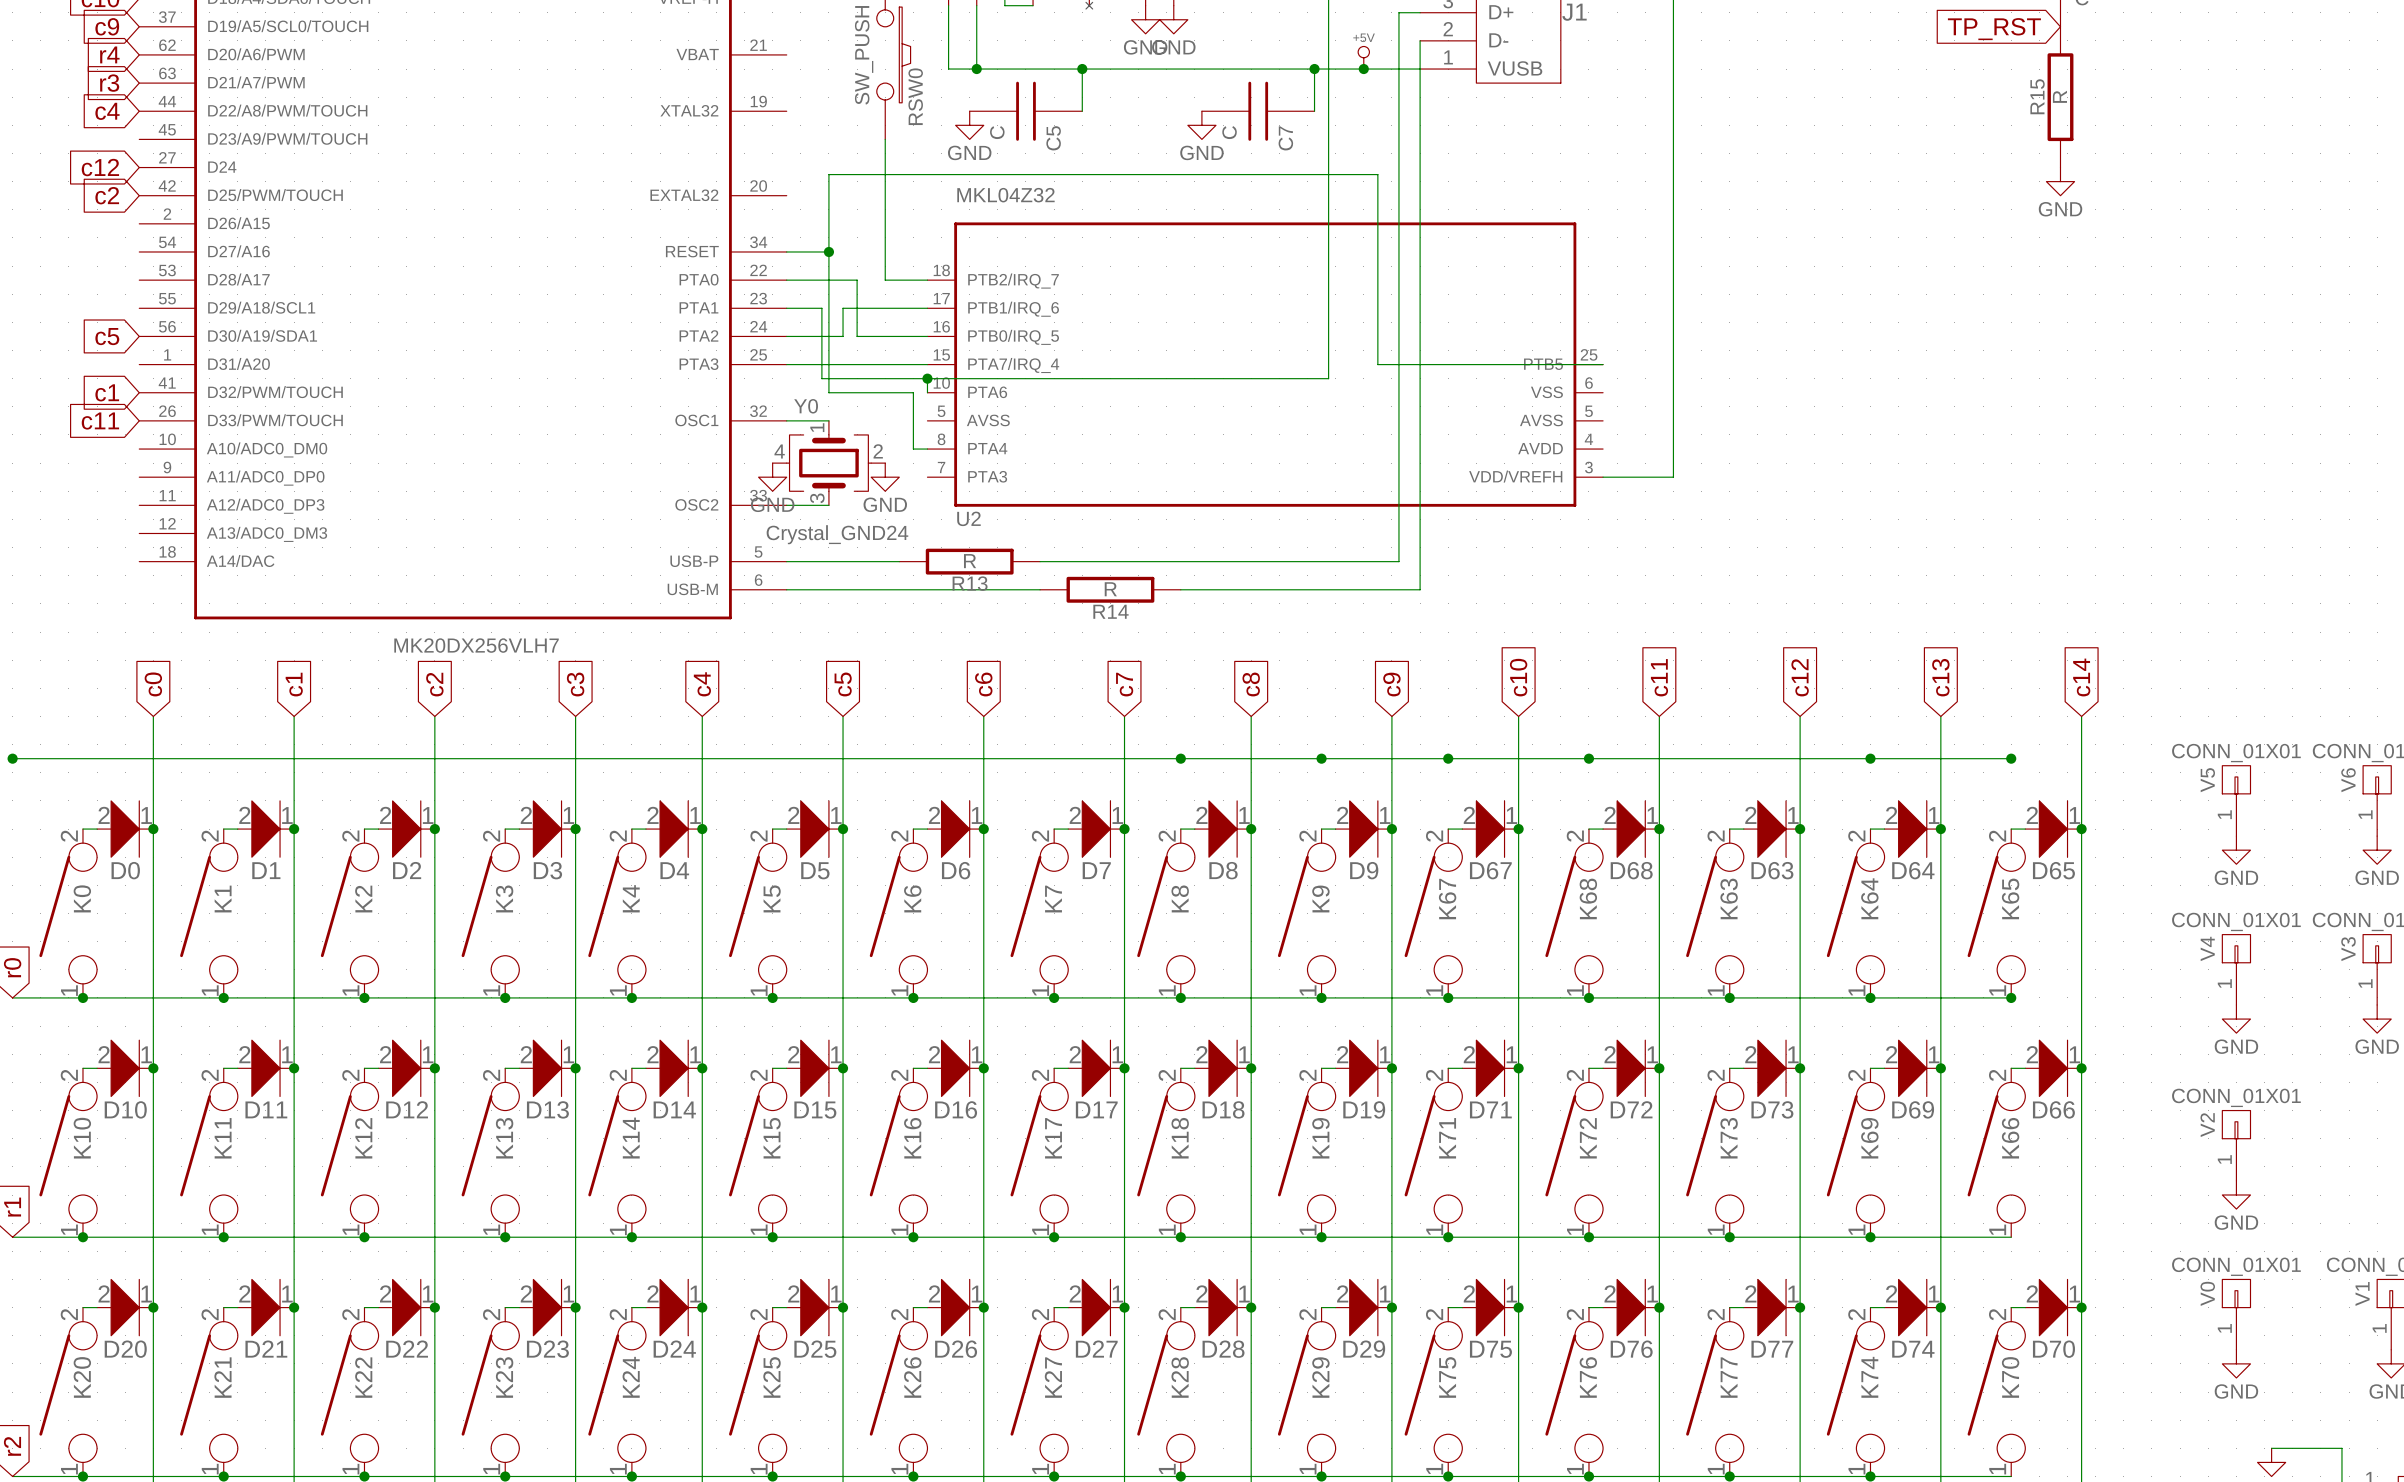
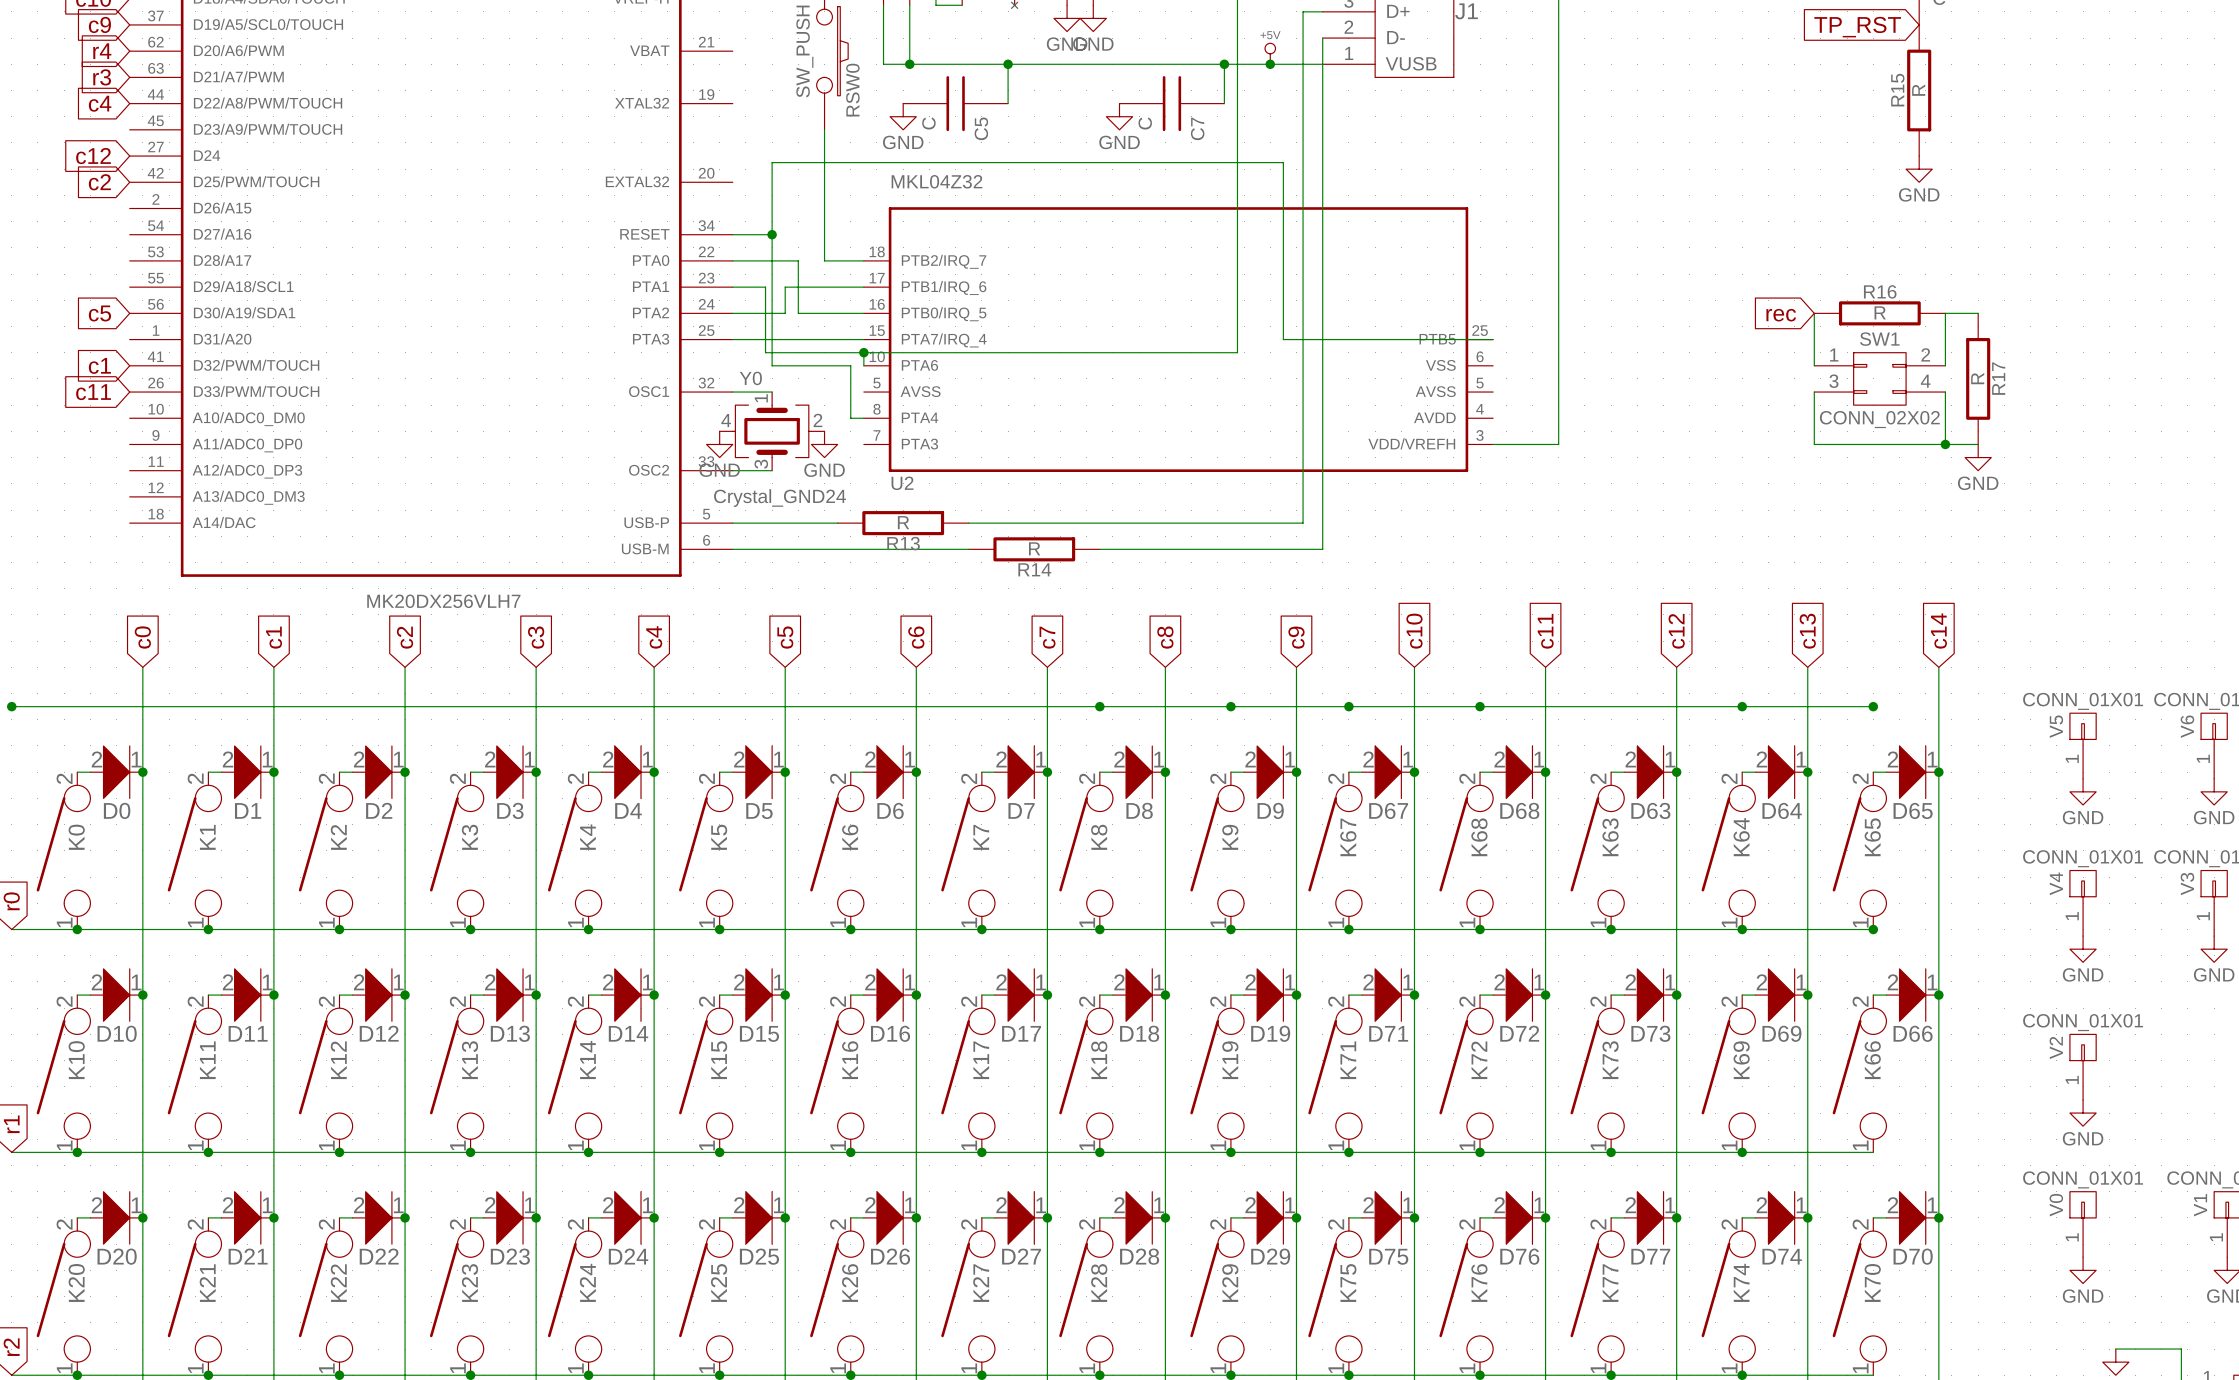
wire: none -> (1814, 313) (1814, 365)
R16: none -> R (1879, 313)
wire: none -> (1978, 313) (1945, 313) (1945, 365)
global label: none -> rec (1781, 315)
SW1: none -> CONN_02X02 (1879, 378)
R17: none -> R (1978, 378)
wire: none -> (1814, 392) (1814, 444) (1978, 444)
wire: none -> (1945, 392) (1945, 444)
junction: none -> (1945, 444)
power symbol: none -> GND (1978, 457)

